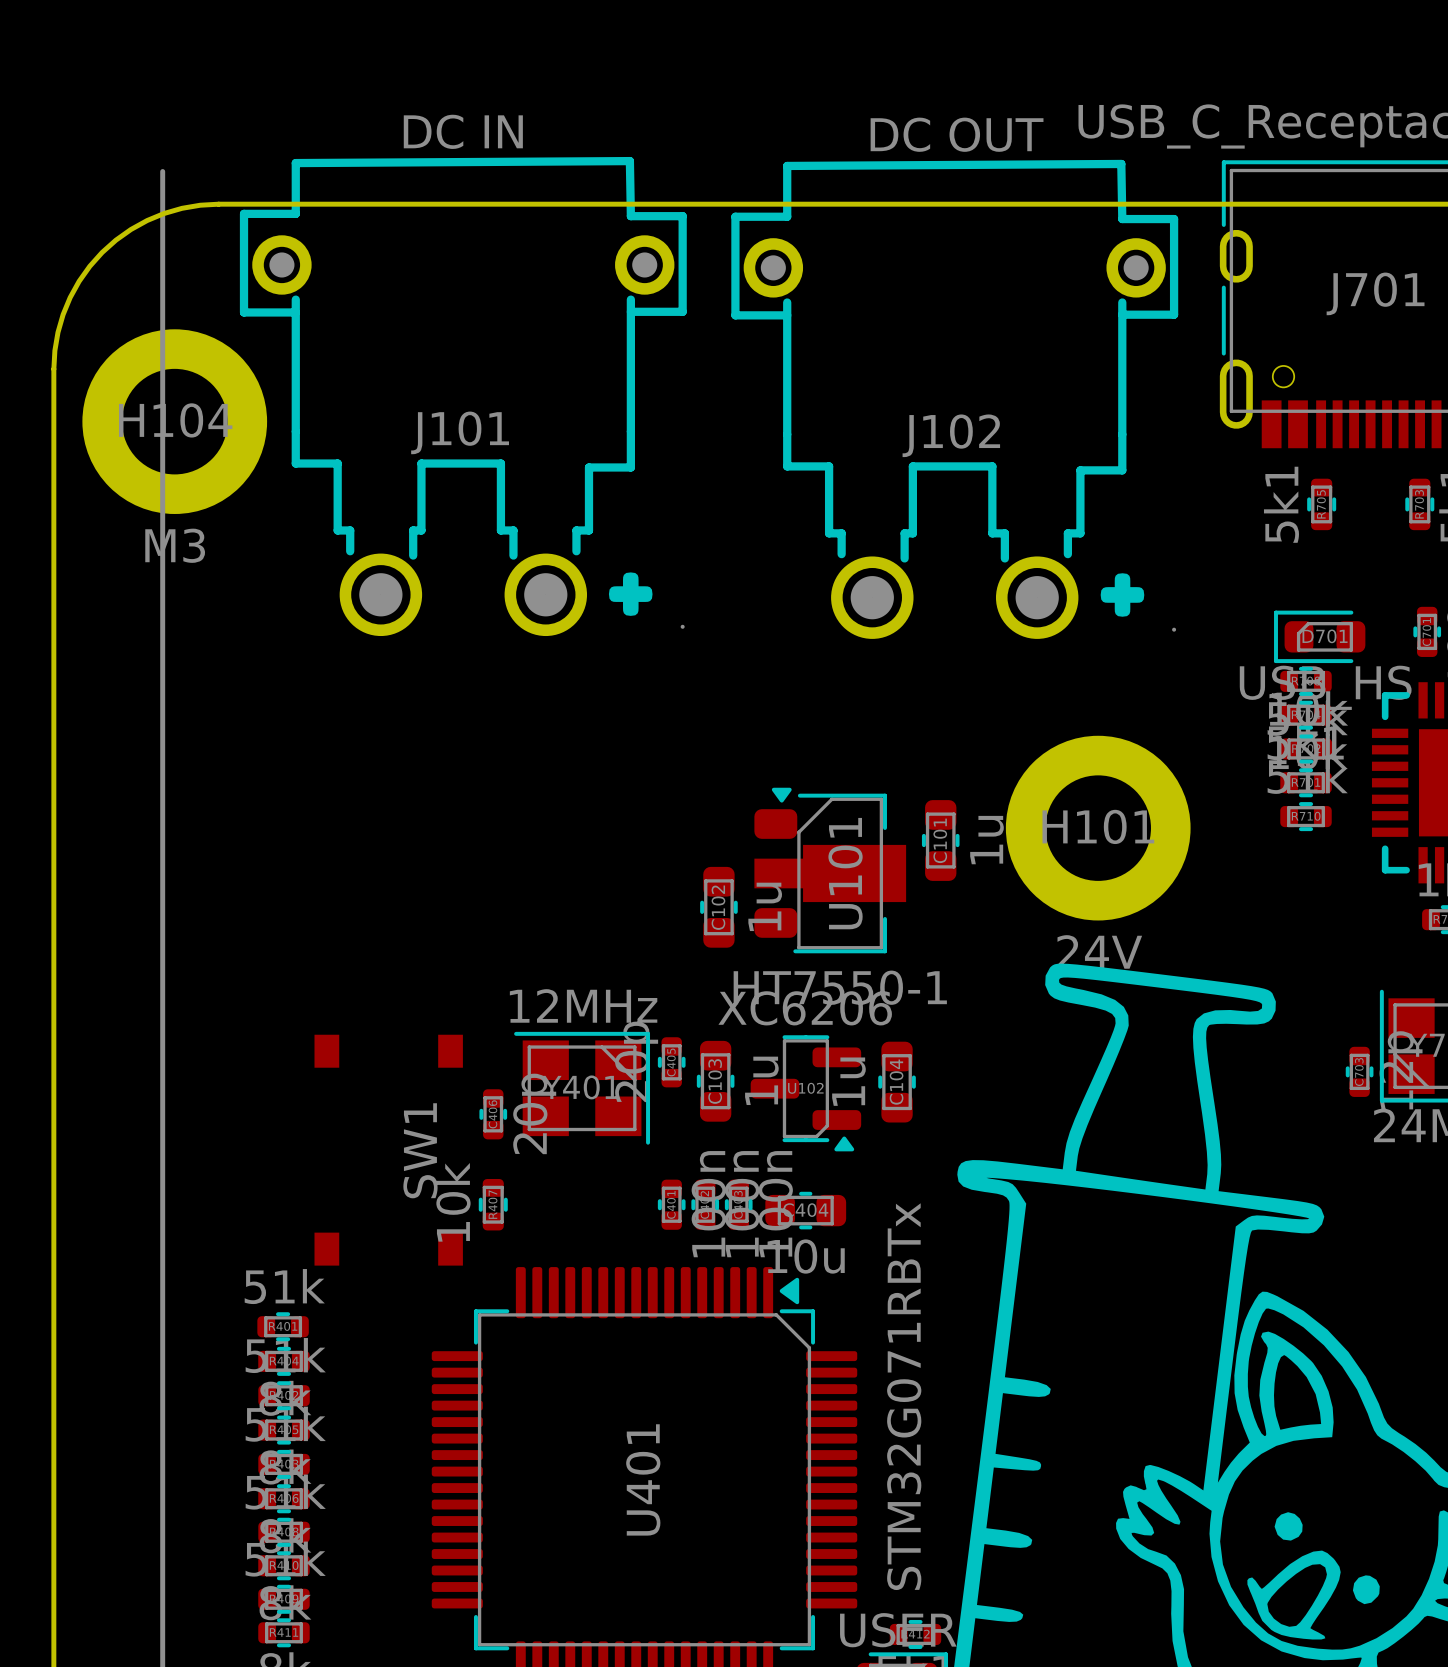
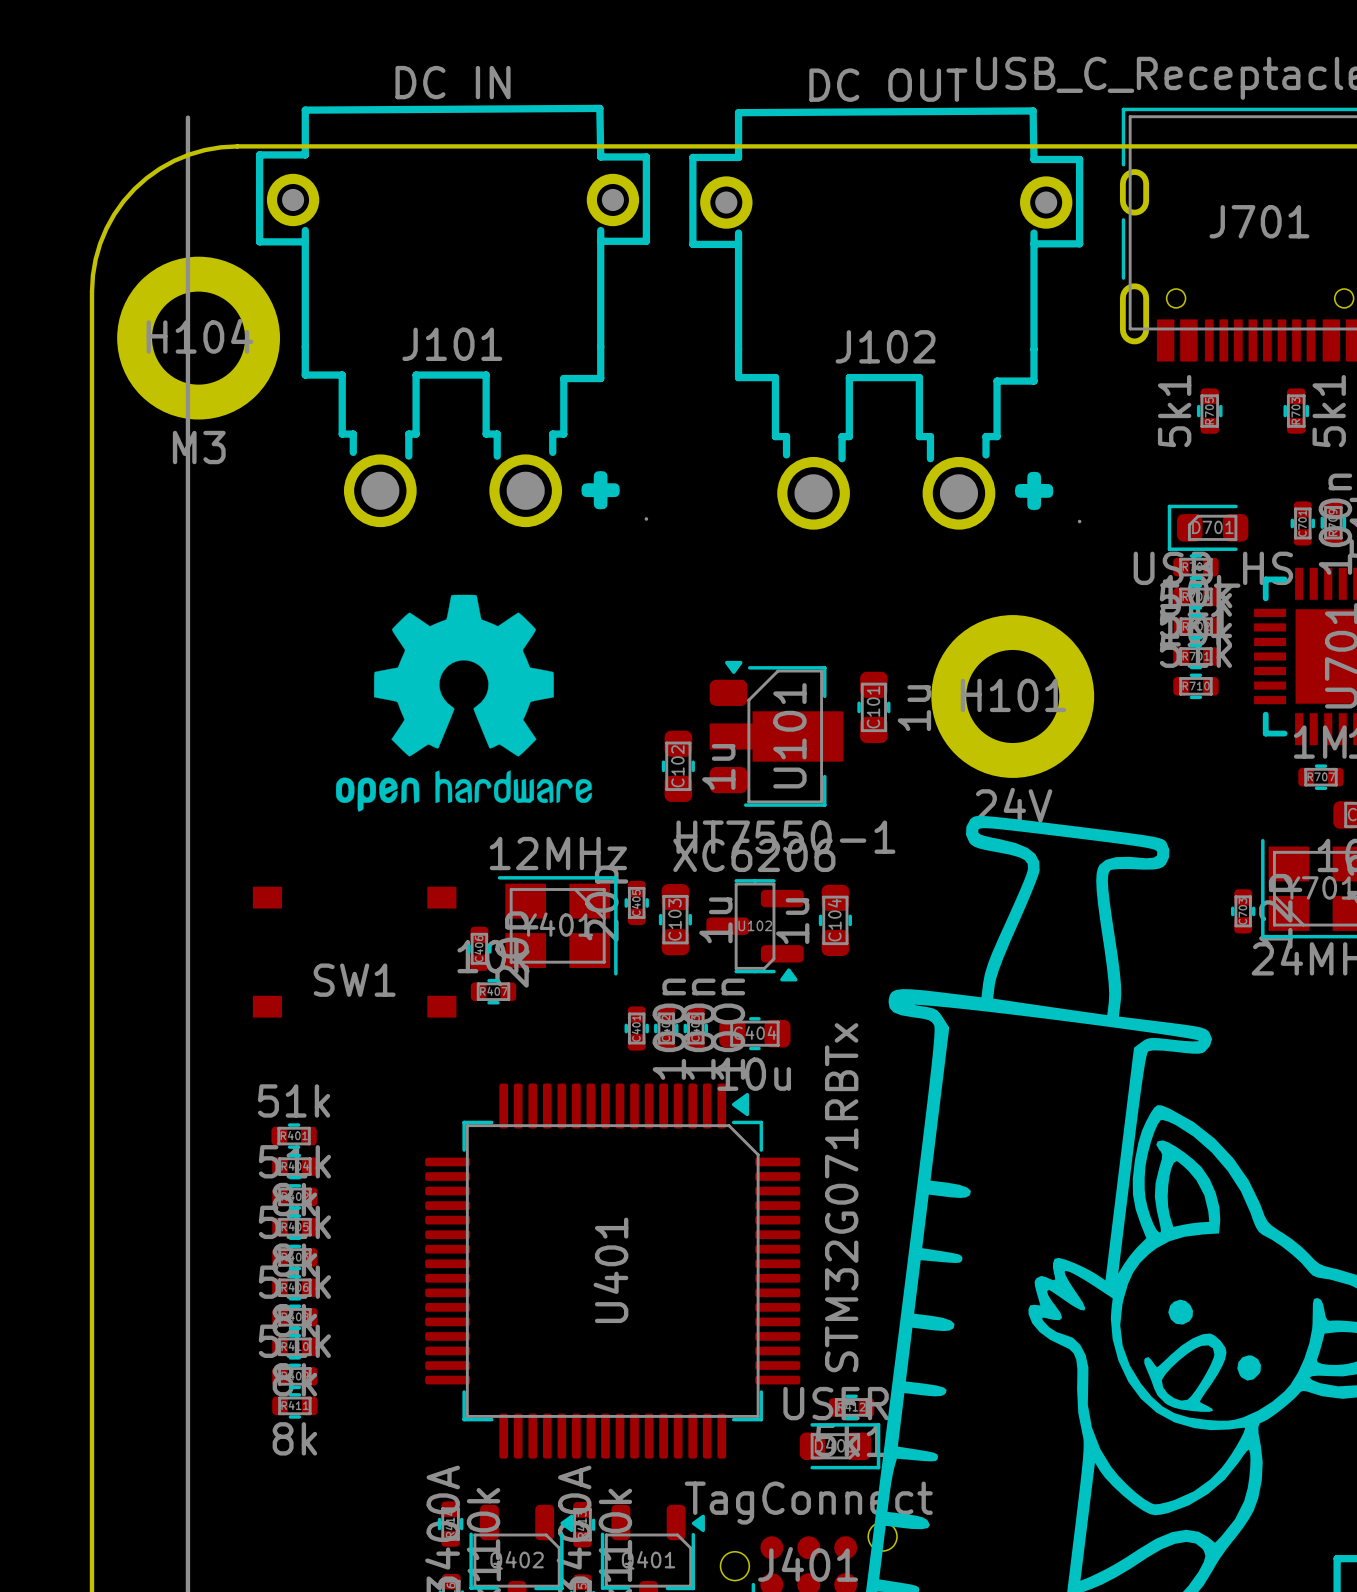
drawing: none -> [335, 594, 592, 812]
SW1 rotation: 0° (388, 1150) -> 90° clockwise (354, 952)
R407 rotation: 0° (493, 1204) -> 90° clockwise (493, 991)
R407 position: (493, 1204) -> (493, 991)

